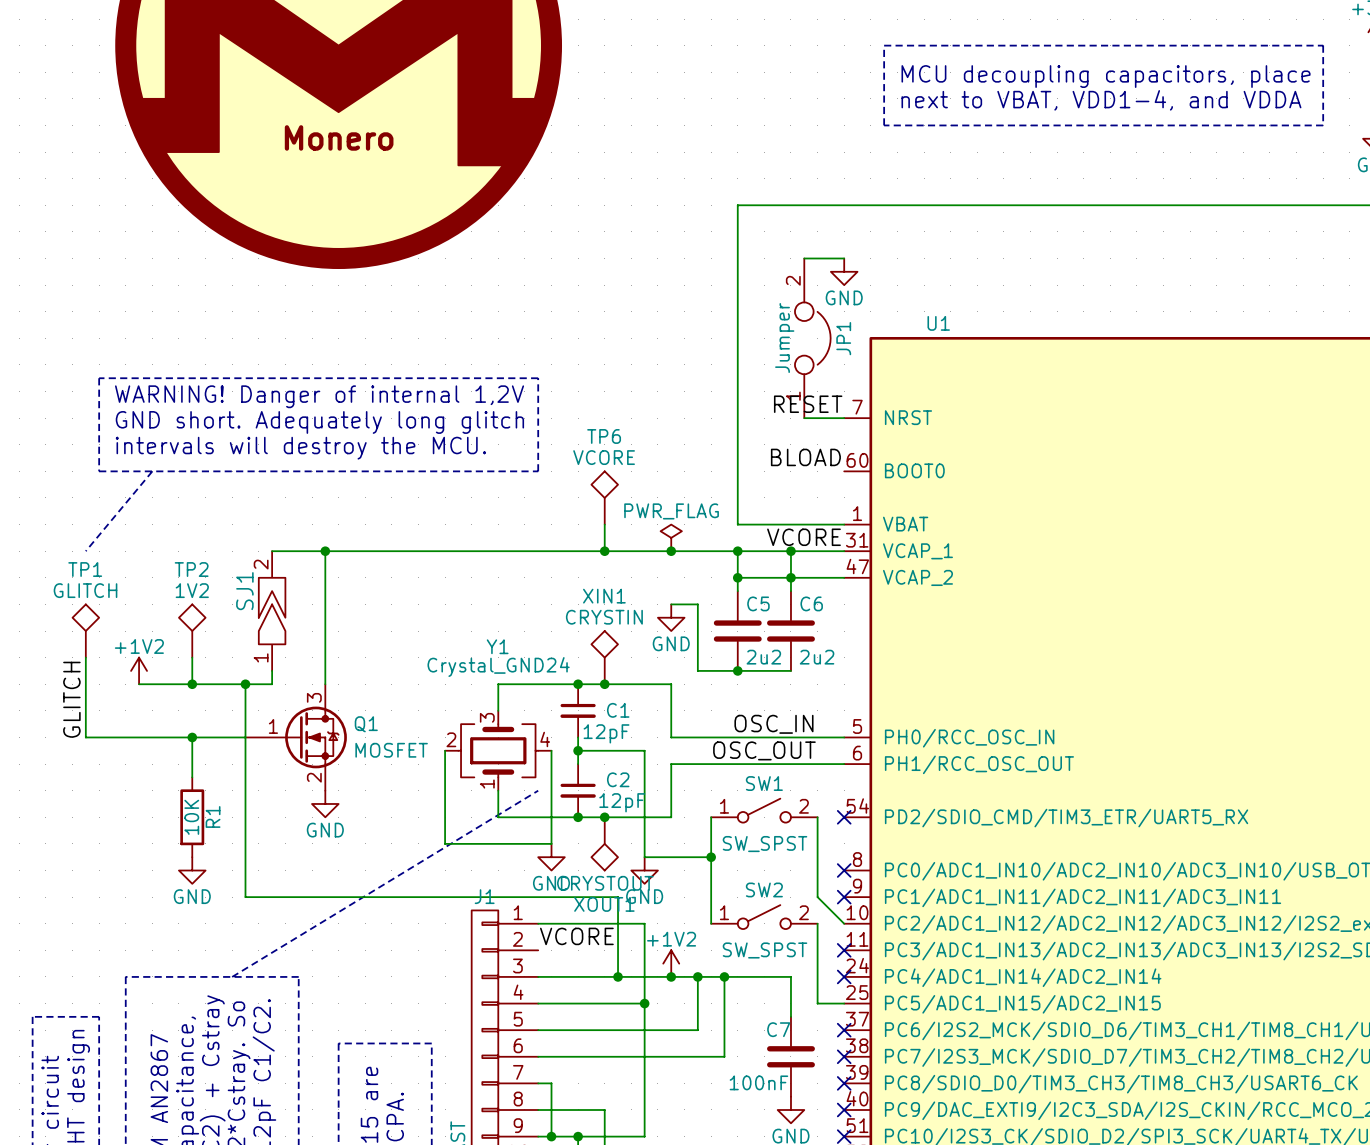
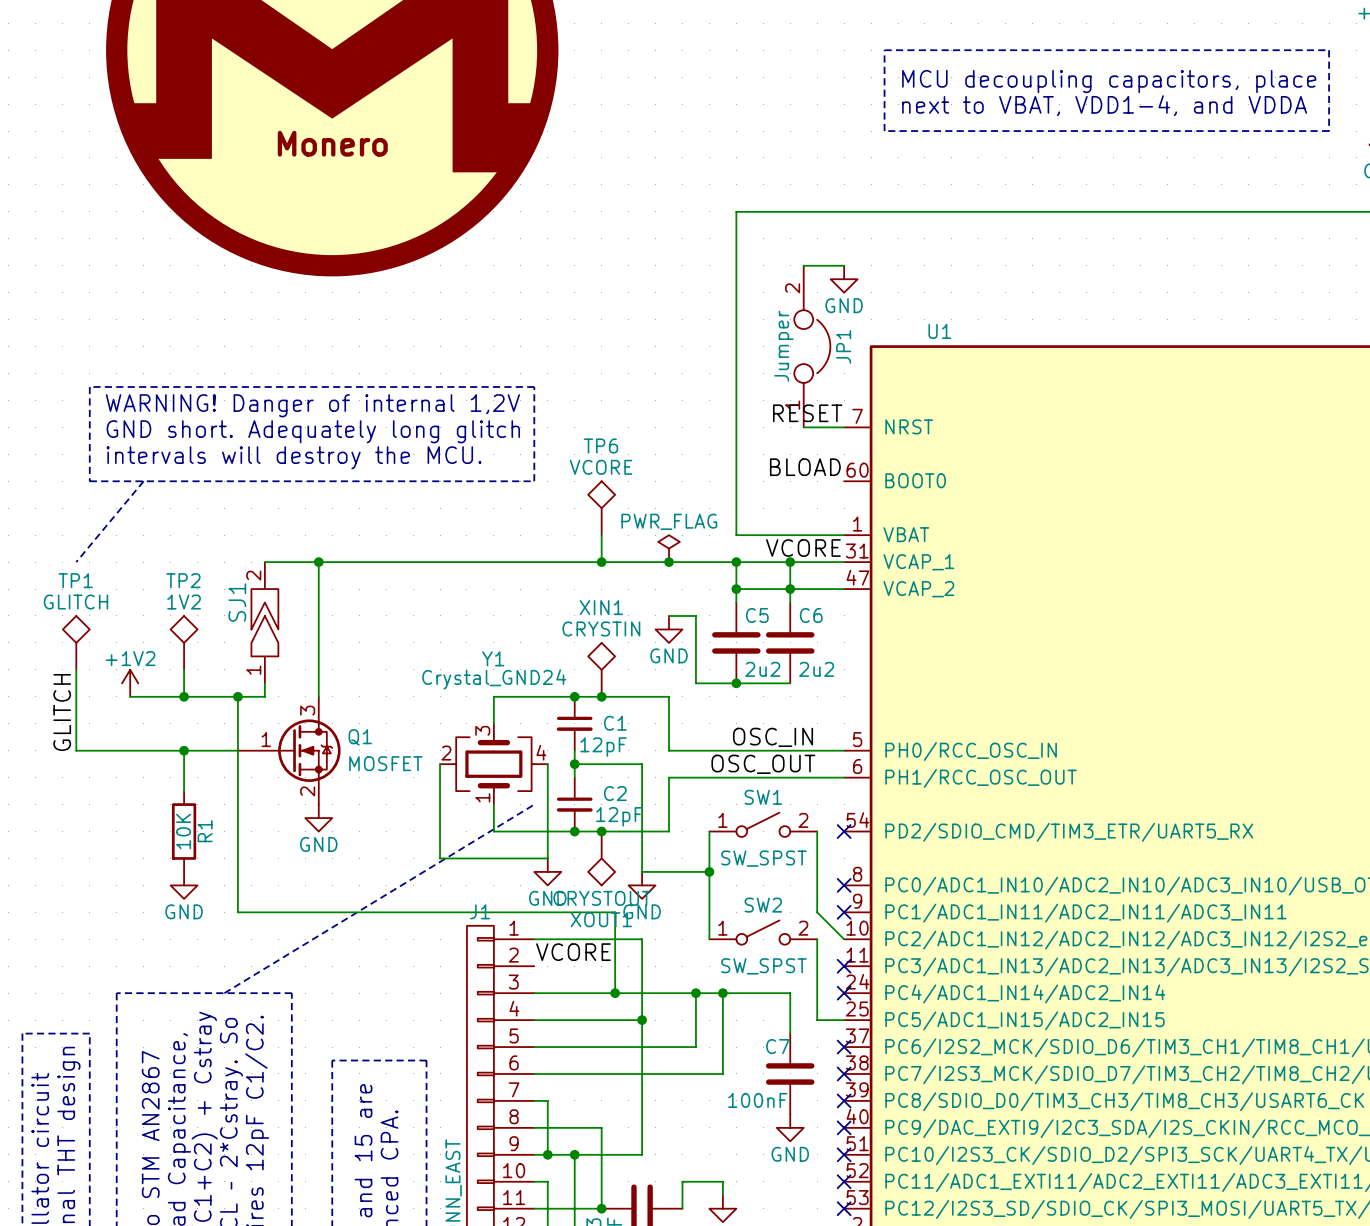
power symbol: +1V2 (671, 963) -> none
junction: (671, 976) -> none

